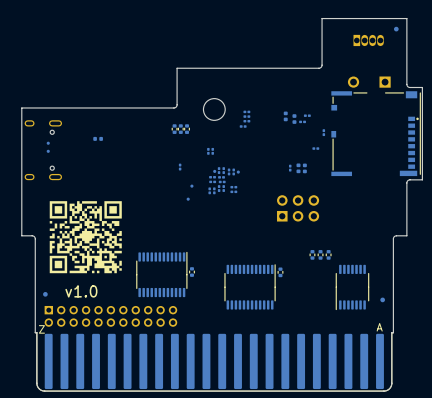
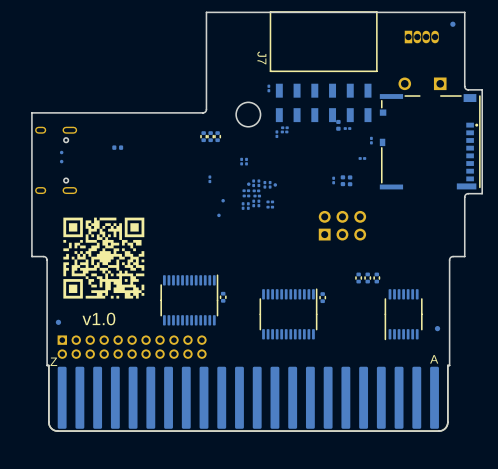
board edge: (322, 18) (322, 65) (320, 68) (177, 68) -> (369, 12) (206, 12) (206, 68)
J7: none -> (323, 66)
part: none -> (268, 88)
part: (246, 111) -> none
part: (307, 115) -> none
part: (246, 116) -> none
part: (285, 116) -> none
part: none -> (284, 131)
part: none -> (276, 134)
part: (243, 126) -> none

